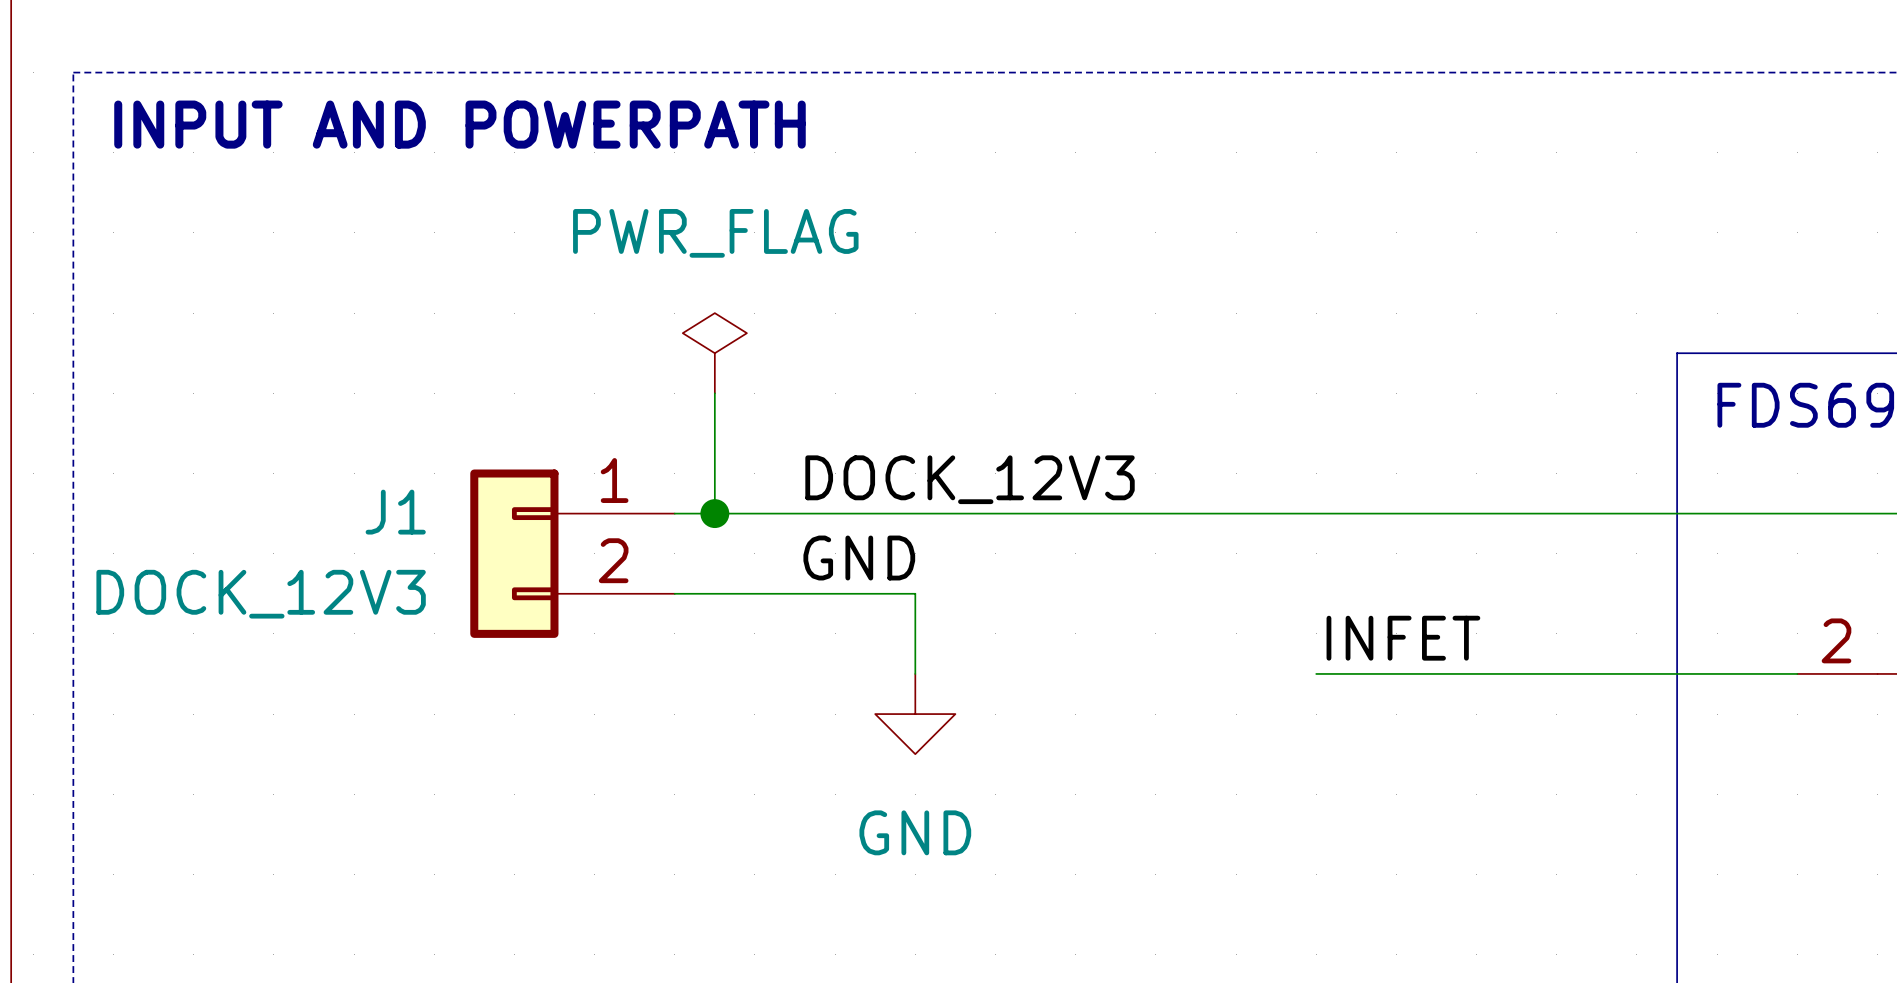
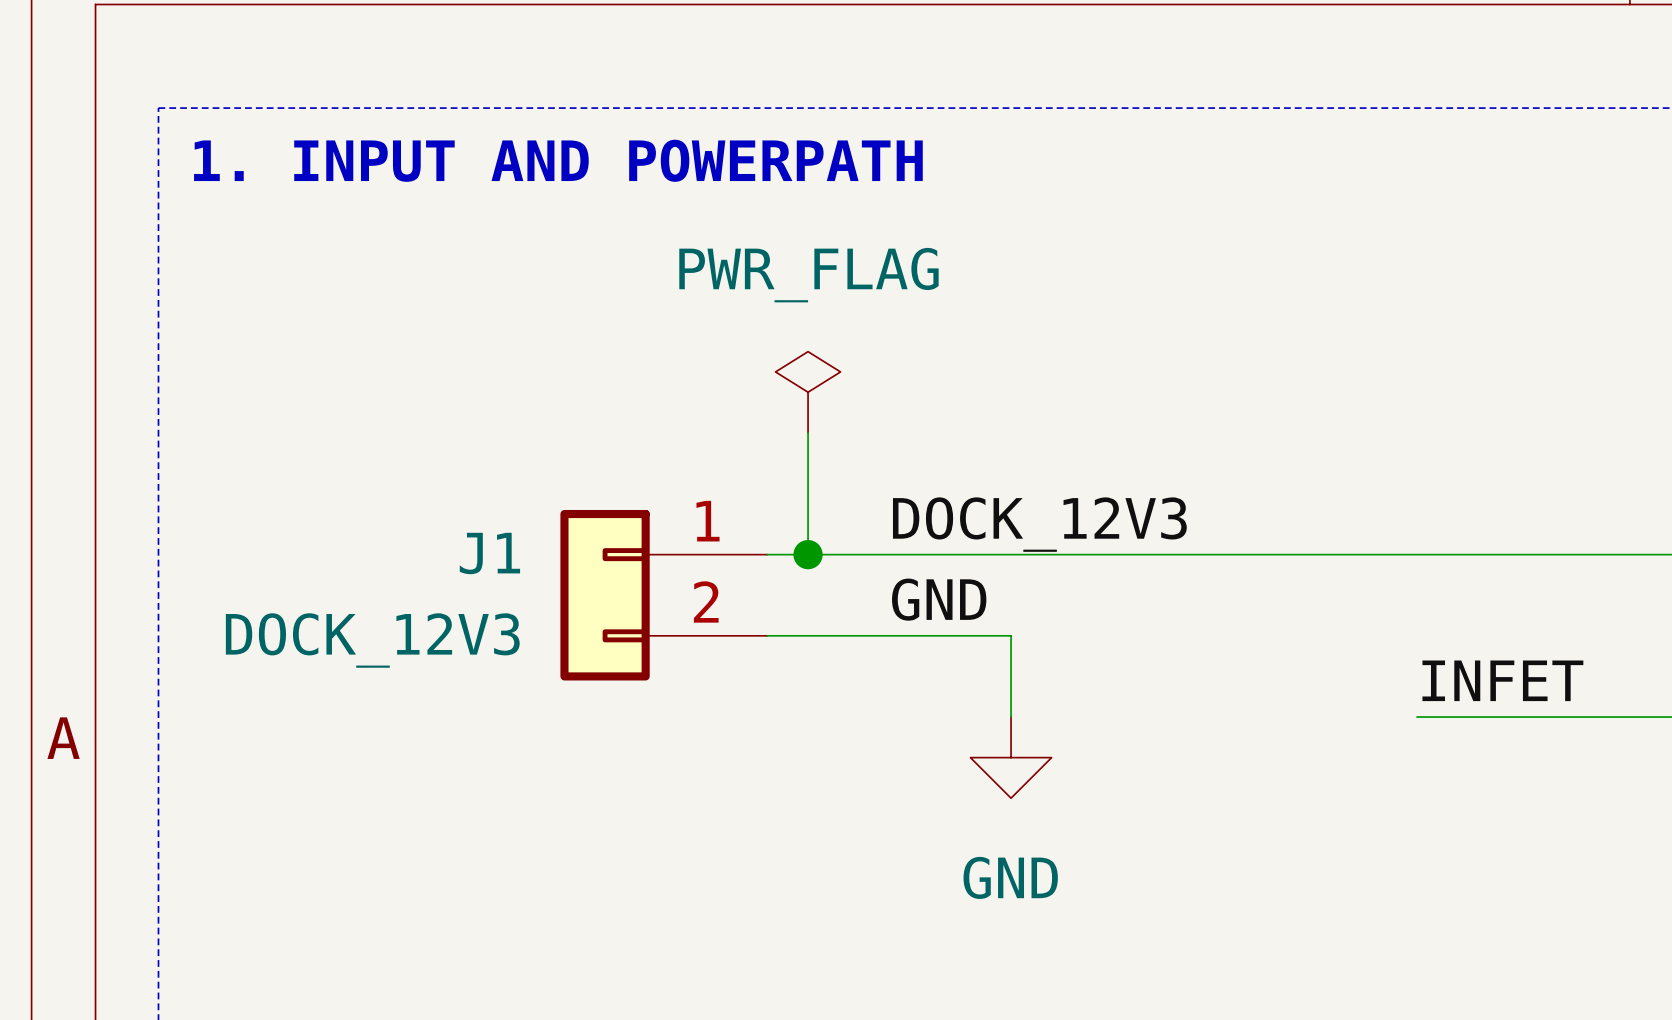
text: INPUT AND POWERPATH (459, 124) -> 1. INPUT AND POWERPATH (558, 160)

